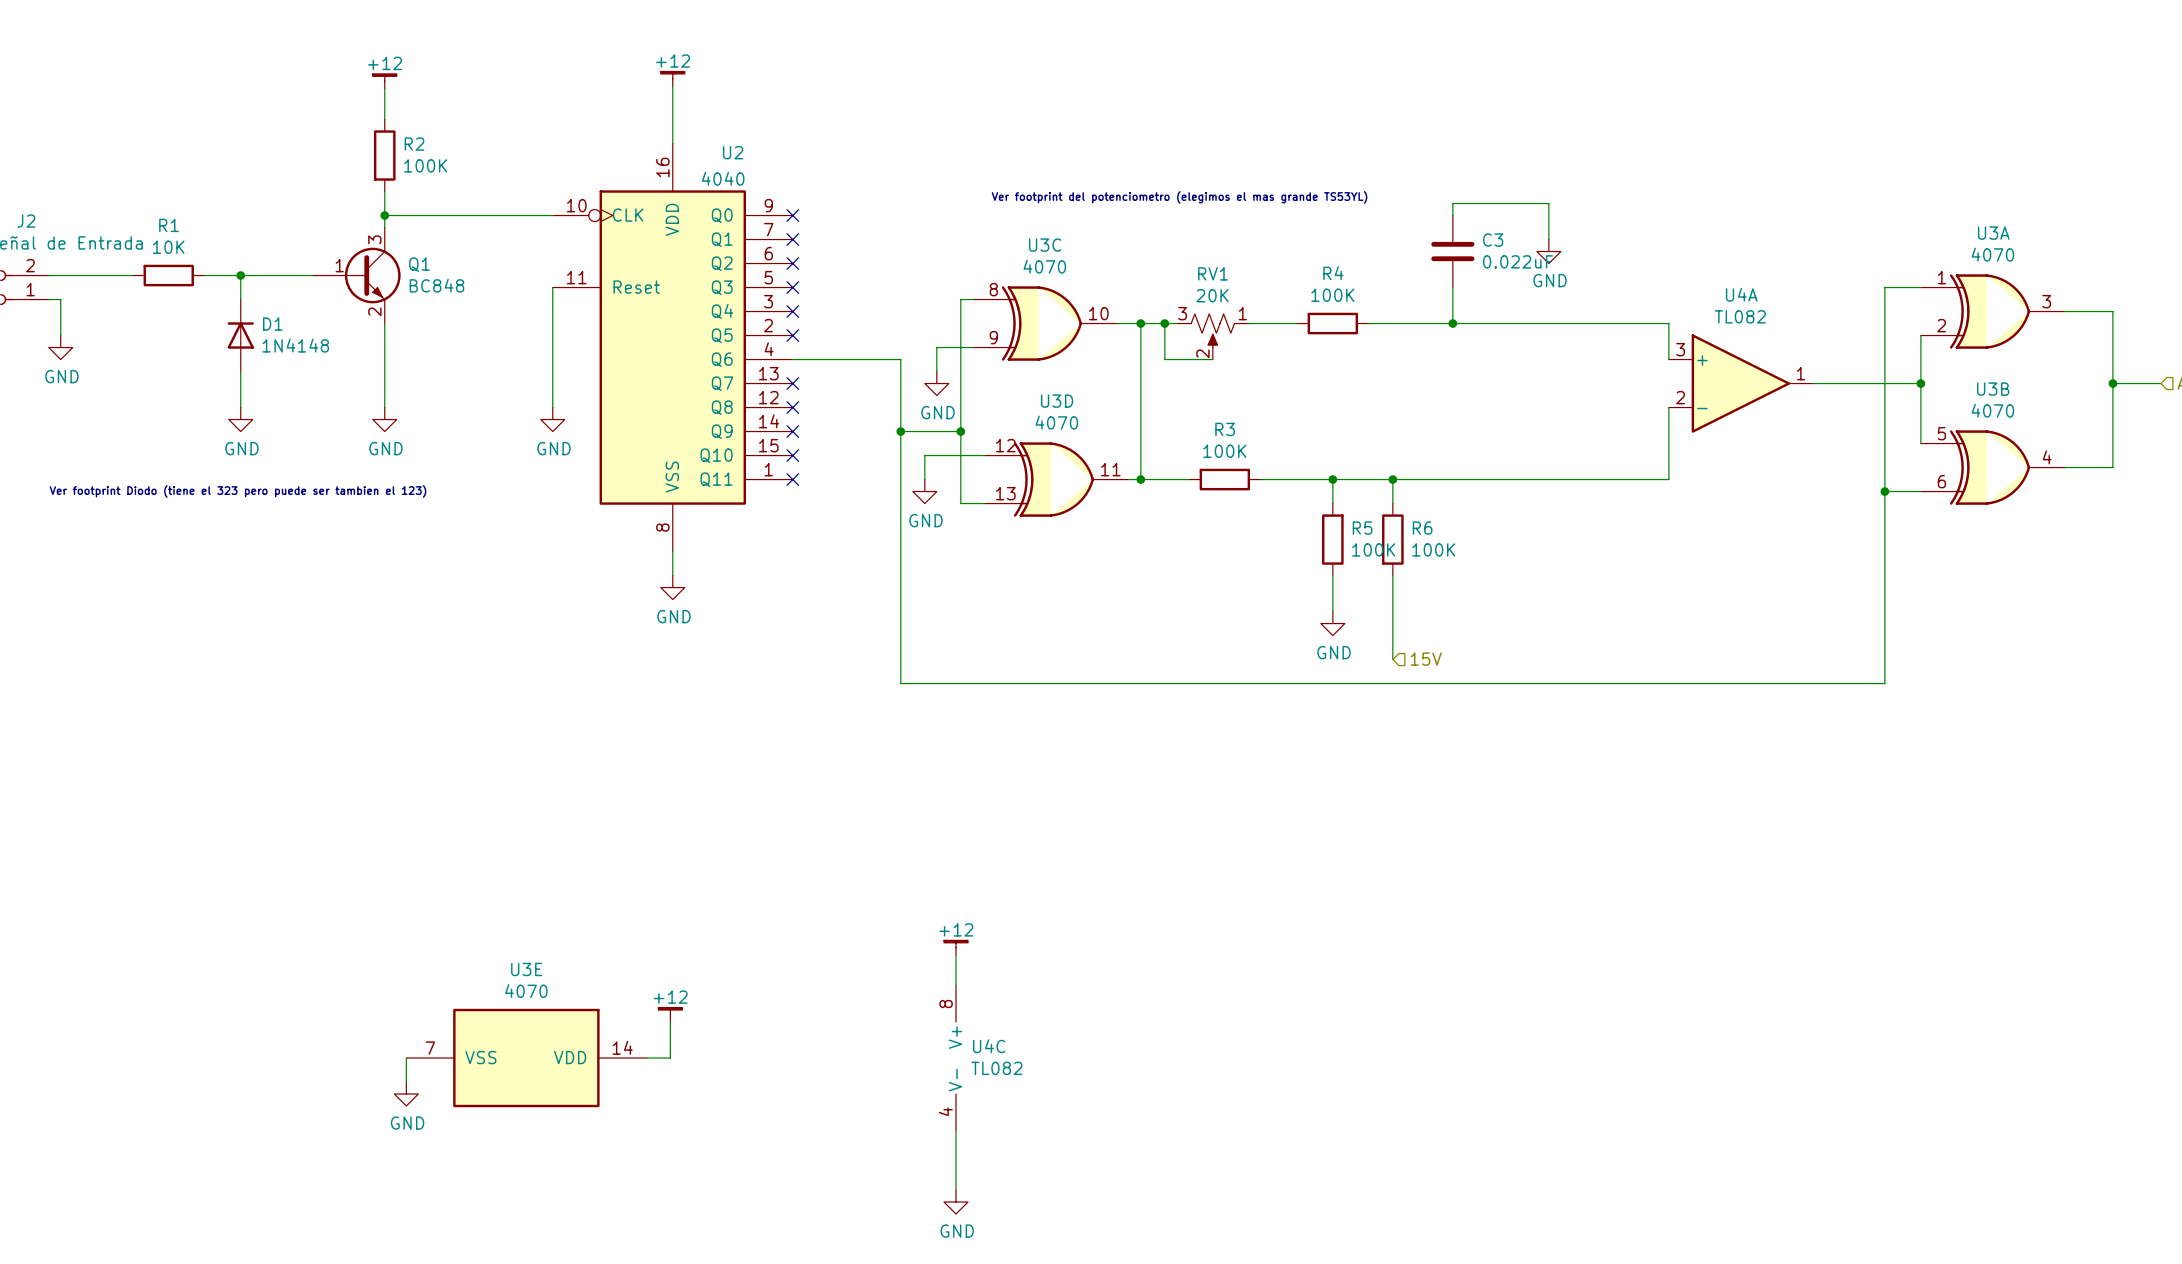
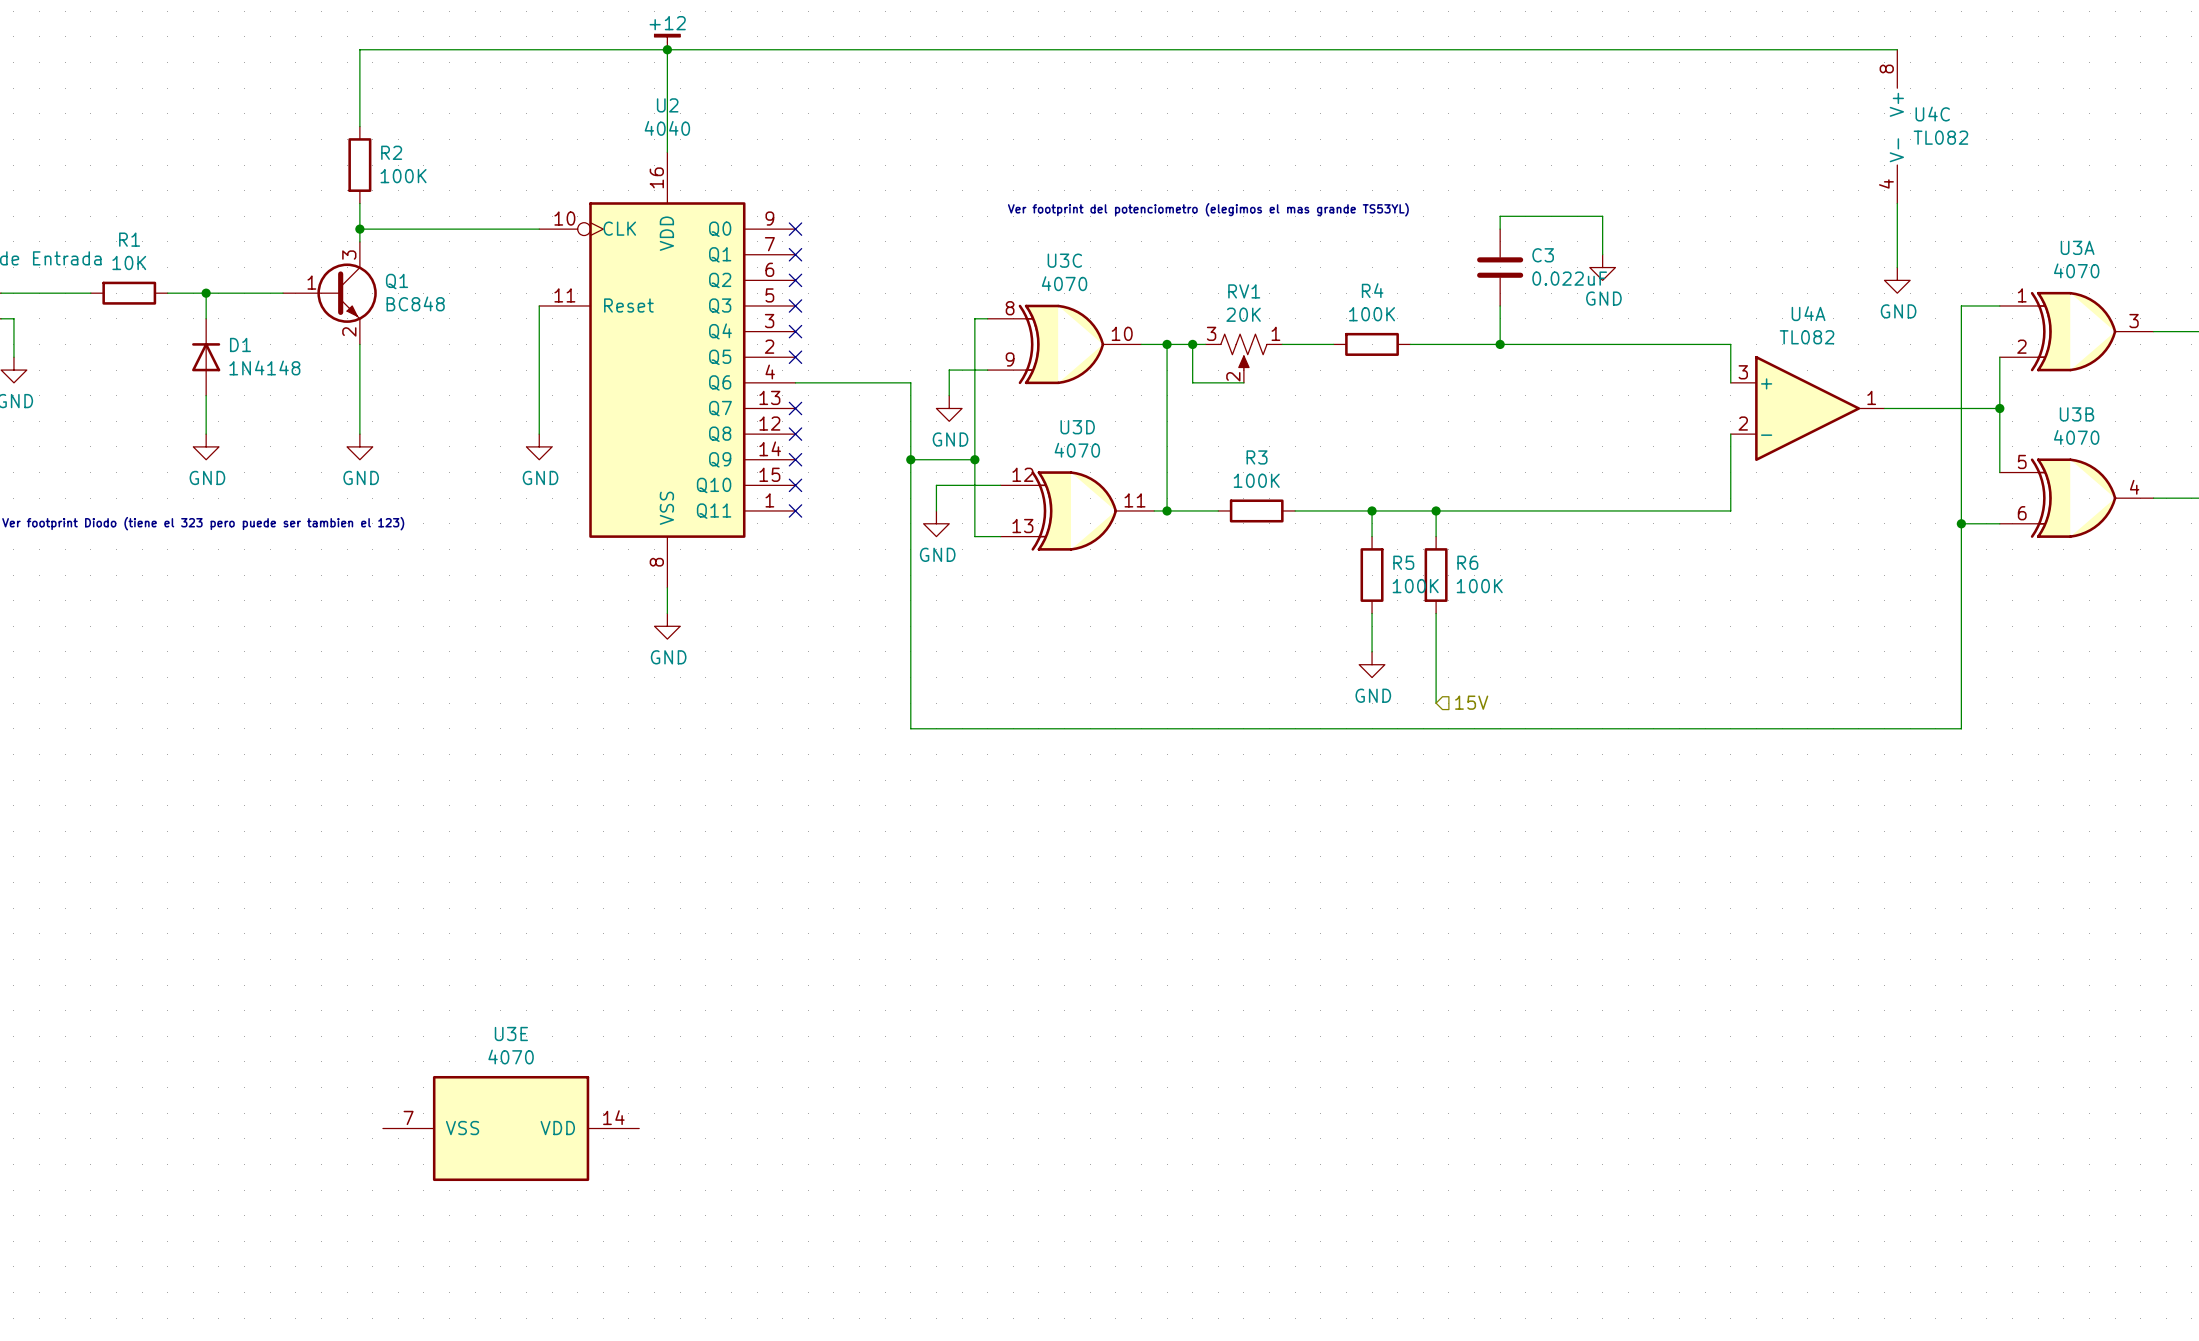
wire: none -> (667, 49) (667, 90)
junction: none -> (667, 49)
wire: none -> (1897, 49) (359, 49) (359, 93)
power symbol position: +12 (672, 78) -> +12 (667, 42)
power symbol: +12 (384, 81) -> none
U2 name position: U2 (733, 152) -> U2 (667, 105)
U2 value position: 4040 (723, 178) -> 4040 (667, 128)
wire: none -> (1897, 203) (1897, 267)
power symbol: none -> GND (1897, 280)
power symbol: +12 (956, 947) -> none
wire: (956, 954) (956, 986) -> none
power symbol: +12 (670, 1014) -> none
wire: (670, 1022) (670, 1058) (646, 1058) -> none
wire: (406, 1058) (406, 1082) -> none
U4C position: (956, 1058) -> (1897, 126)
power symbol: GND (406, 1094) -> none
wire: (956, 1130) (956, 1190) -> none
power symbol: GND (956, 1202) -> none

